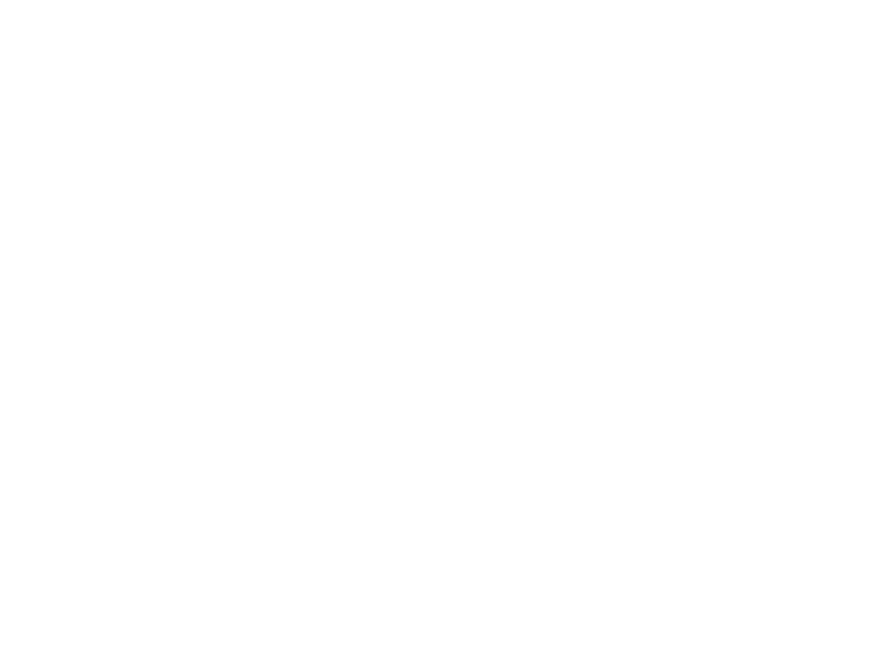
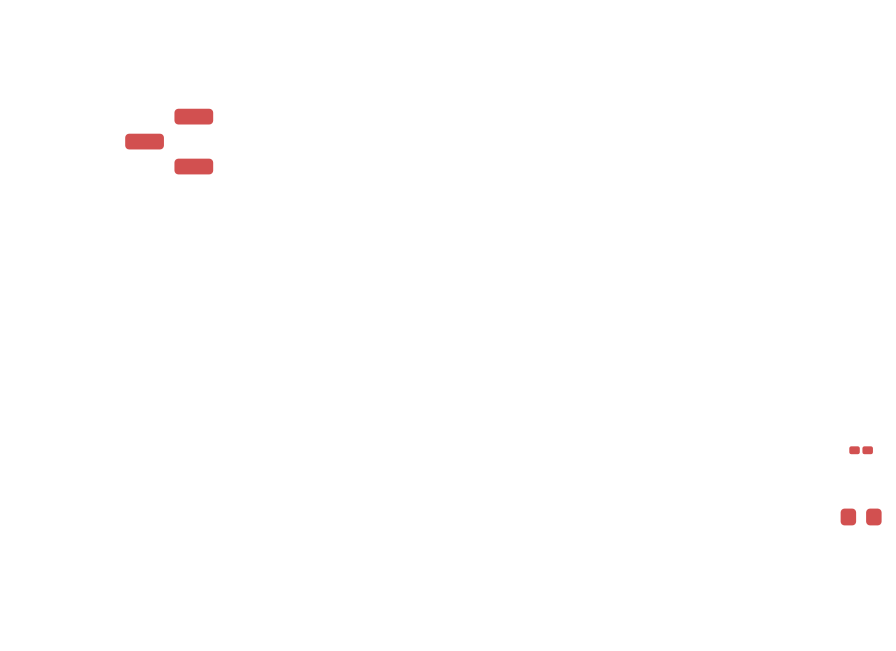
part: none -> (169, 141)
part: none -> (861, 450)
part: none -> (861, 516)

